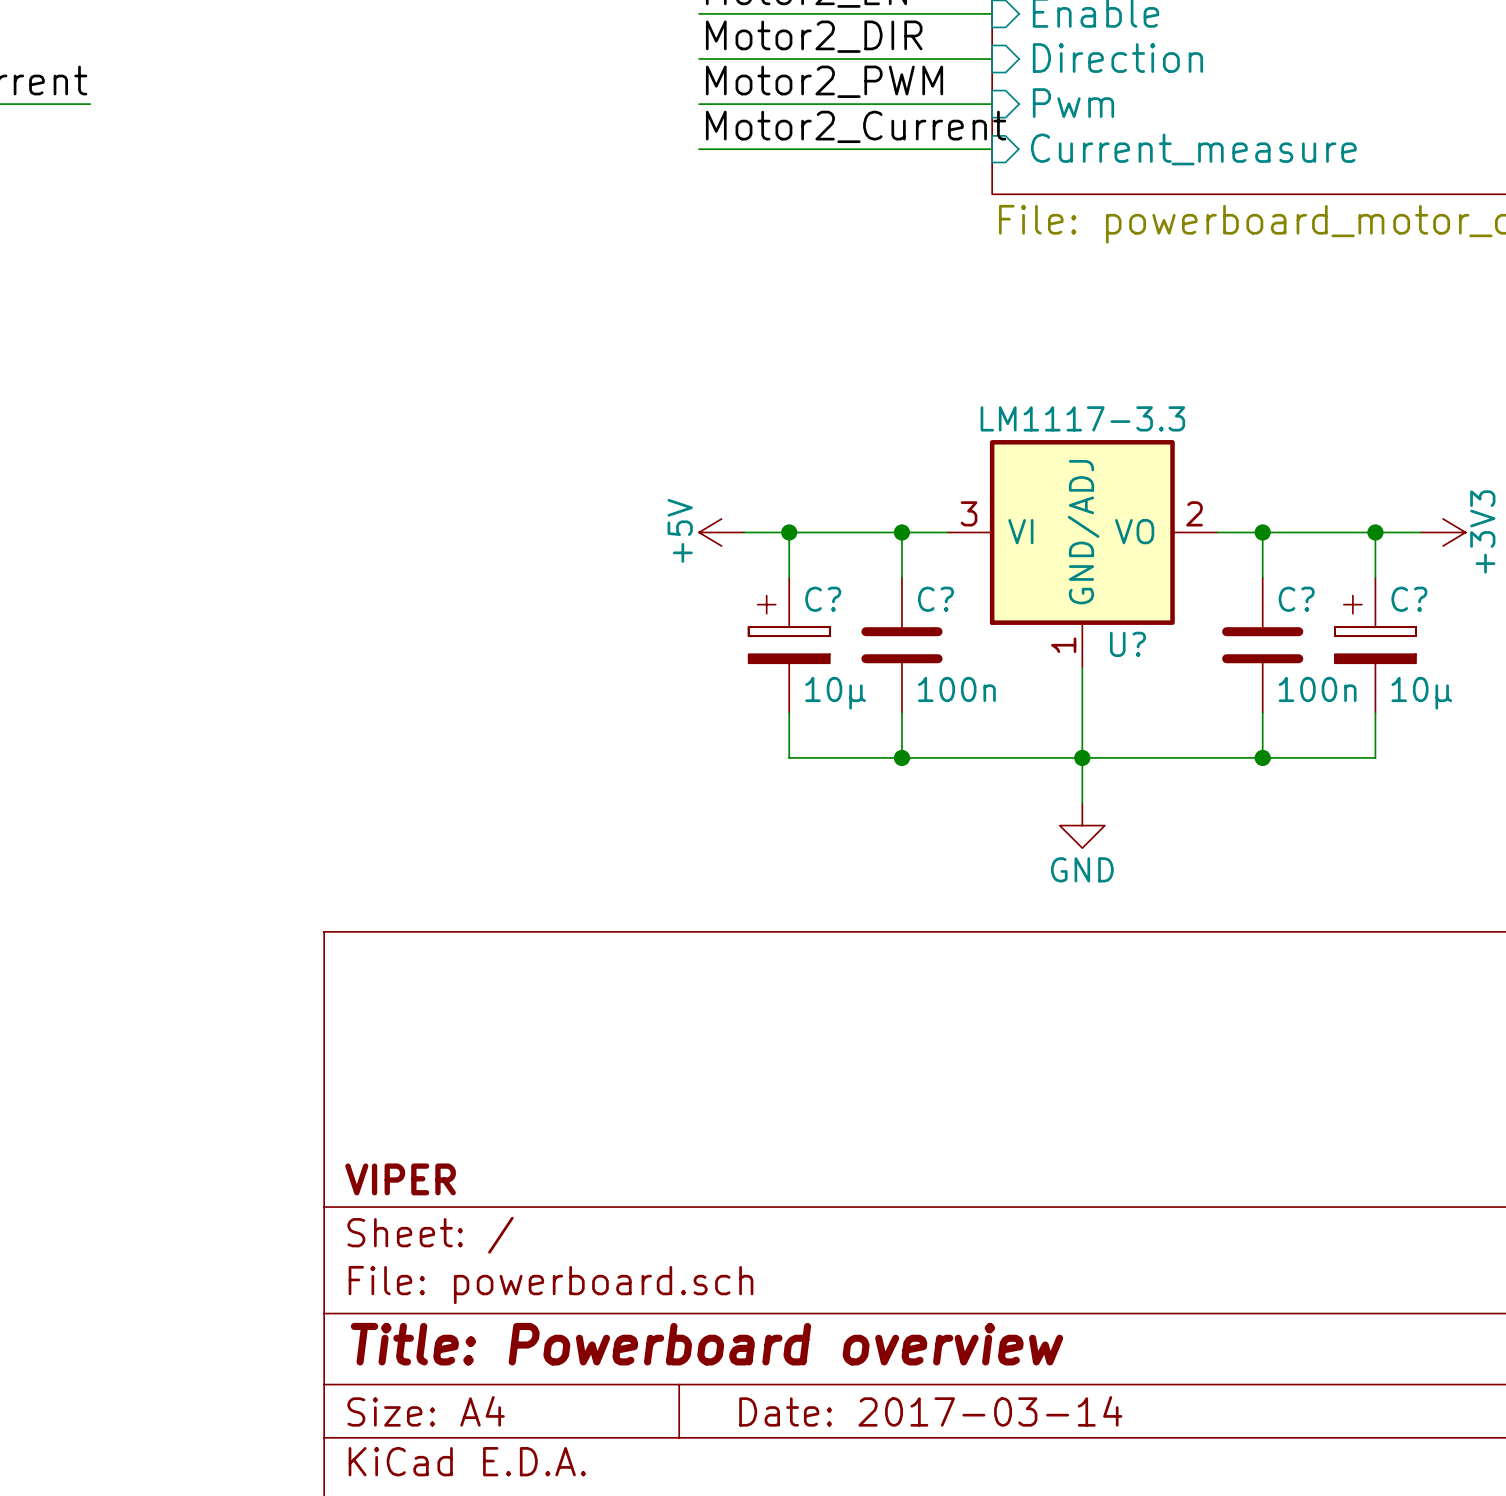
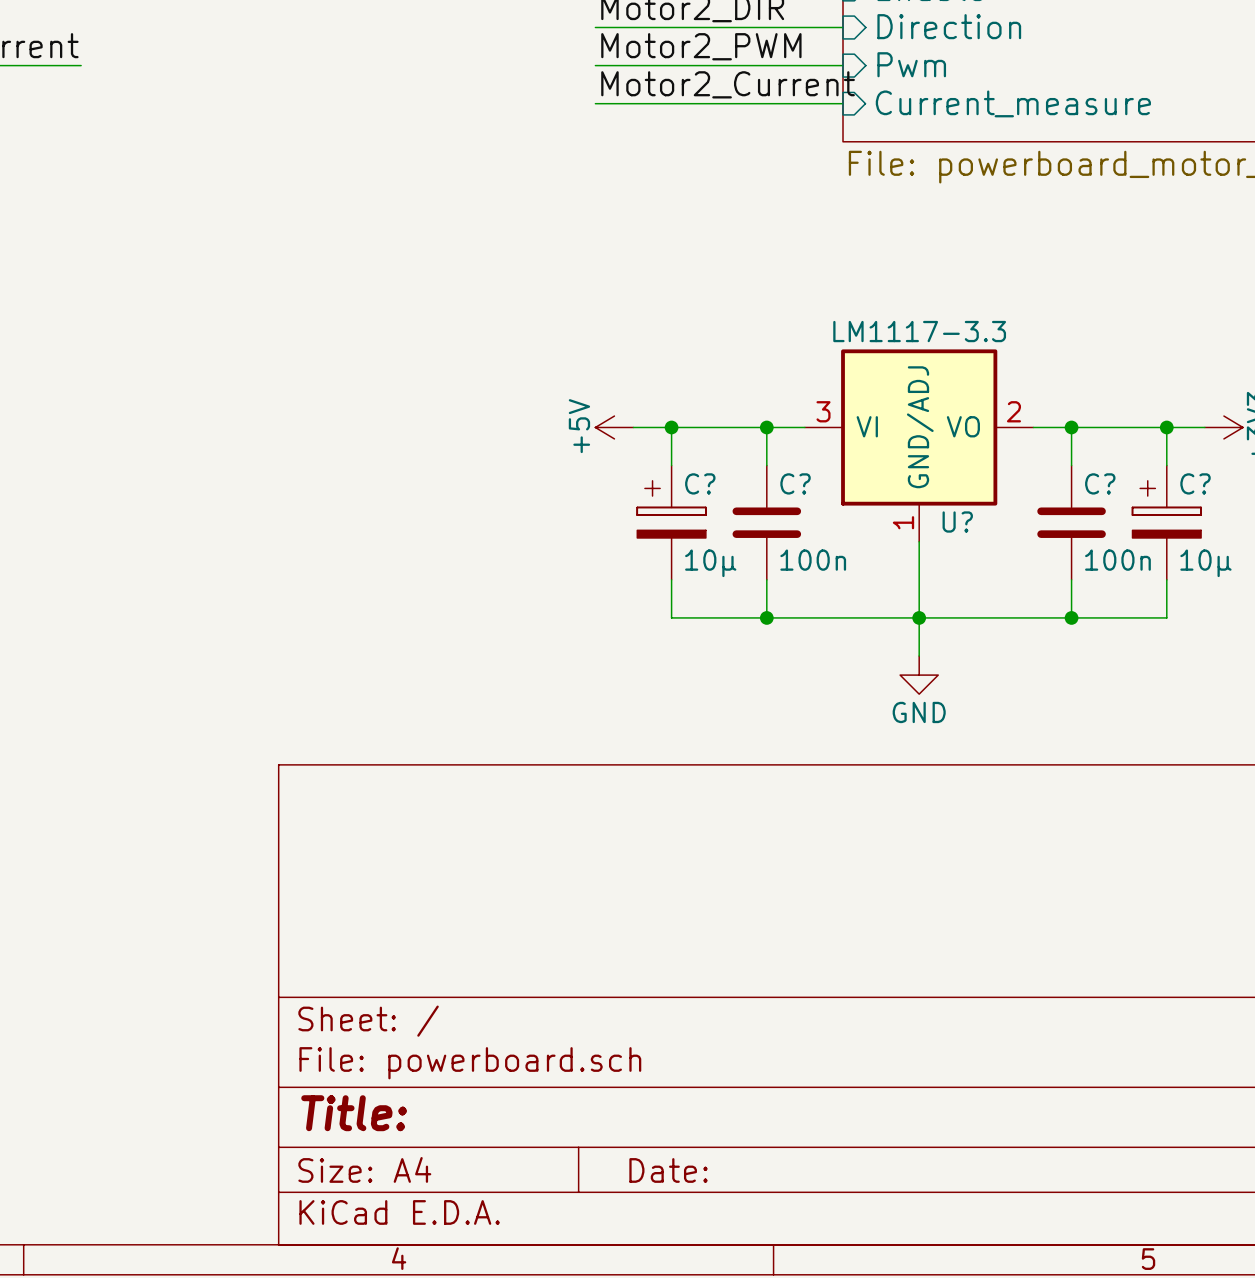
title block: VIPER (400, 1179) -> none
title block: Title: Powerboard overview (707, 1344) -> Title: (354, 1113)
title block: Date: 2017-03-14 (930, 1411) -> Date: (668, 1170)

